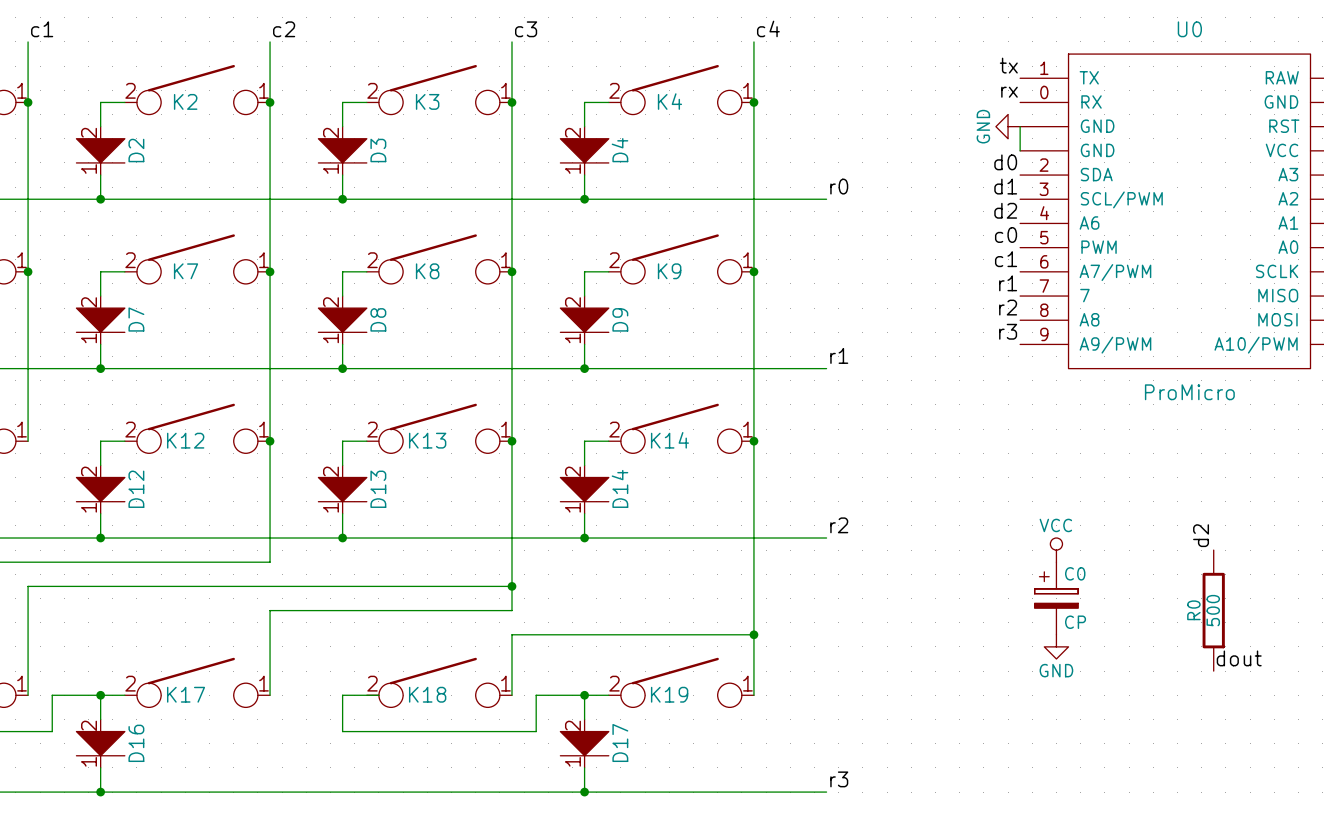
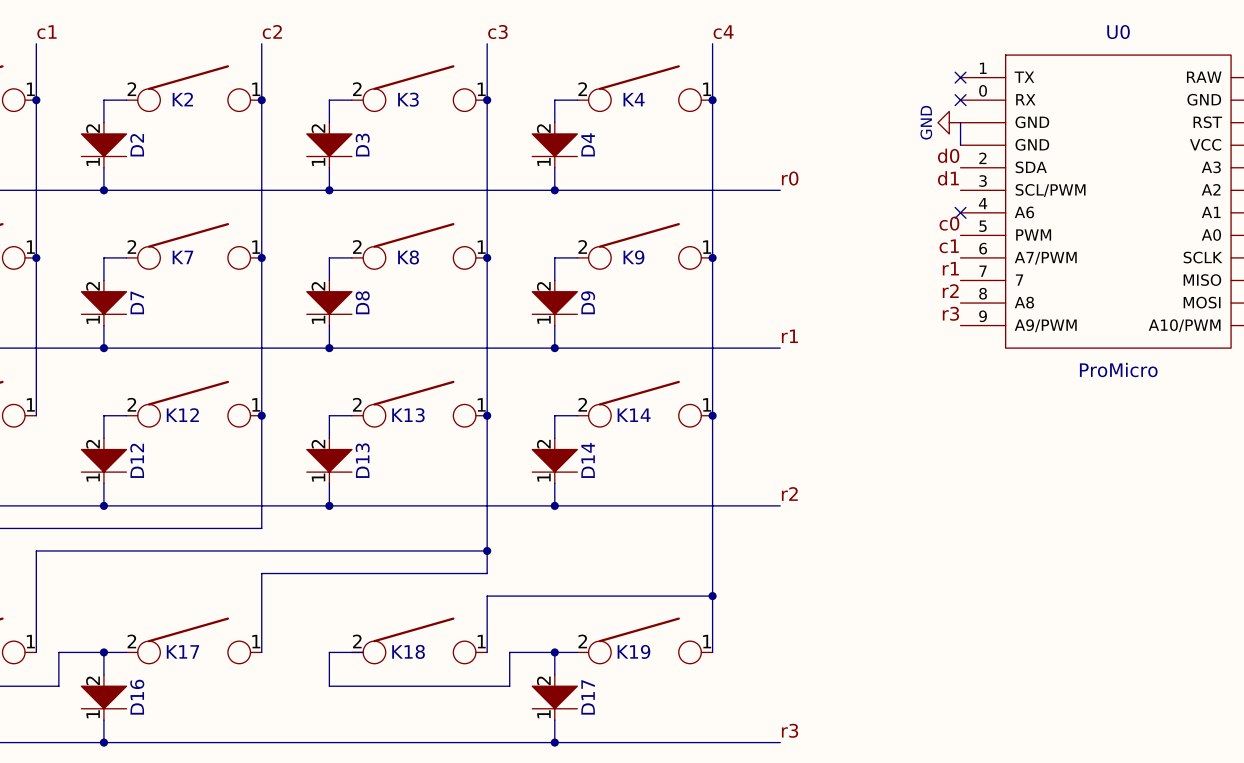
label: tx (1008, 65) -> none
no-connect mark: none -> (960, 77)
label: rx (1009, 92) -> none
no-connect mark: none -> (960, 100)
label: d2 (1005, 210) -> none
no-connect mark: none -> (960, 212)
label: d2 (1201, 535) -> none
power symbol: VCC (1056, 550) -> none
C0: CP (1056, 598) -> none
R0: 500 (1213, 610) -> none
power symbol: GND (1056, 646) -> none
label: dout (1239, 658) -> none

